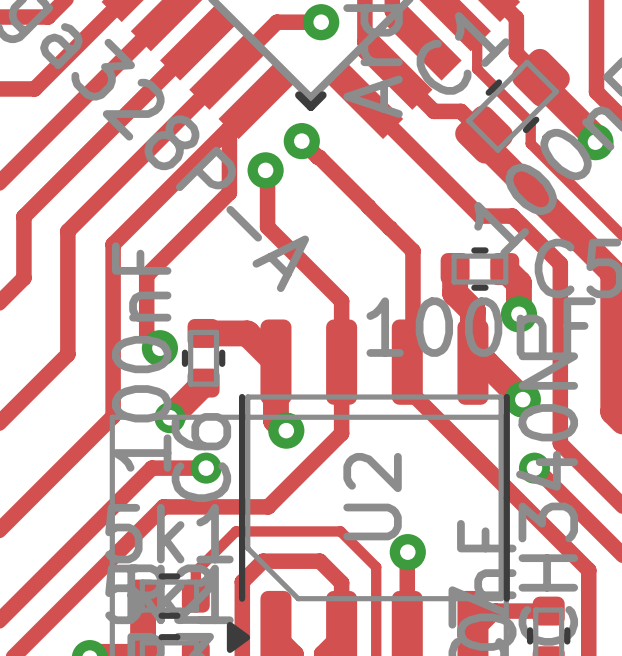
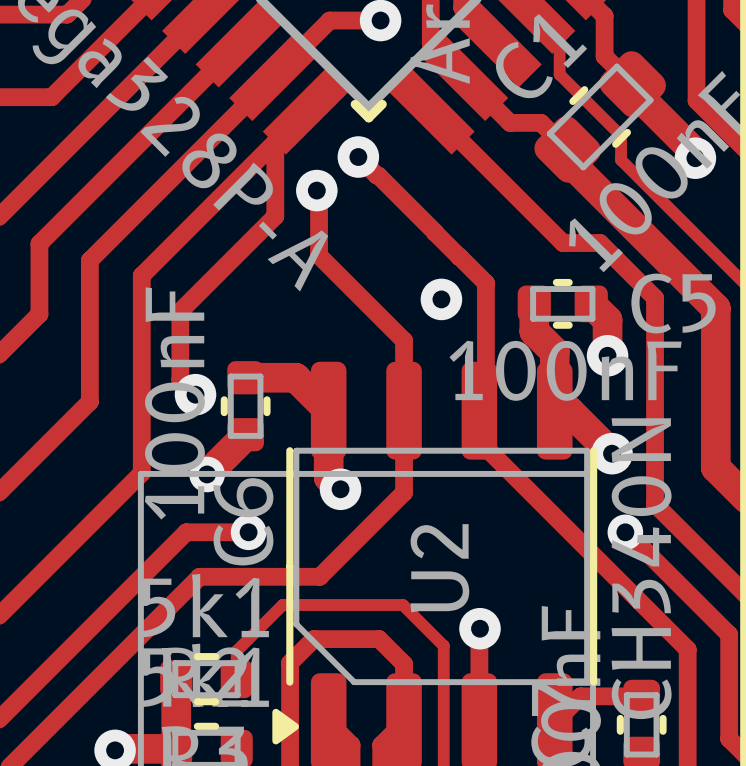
via: none -> (441, 299)

